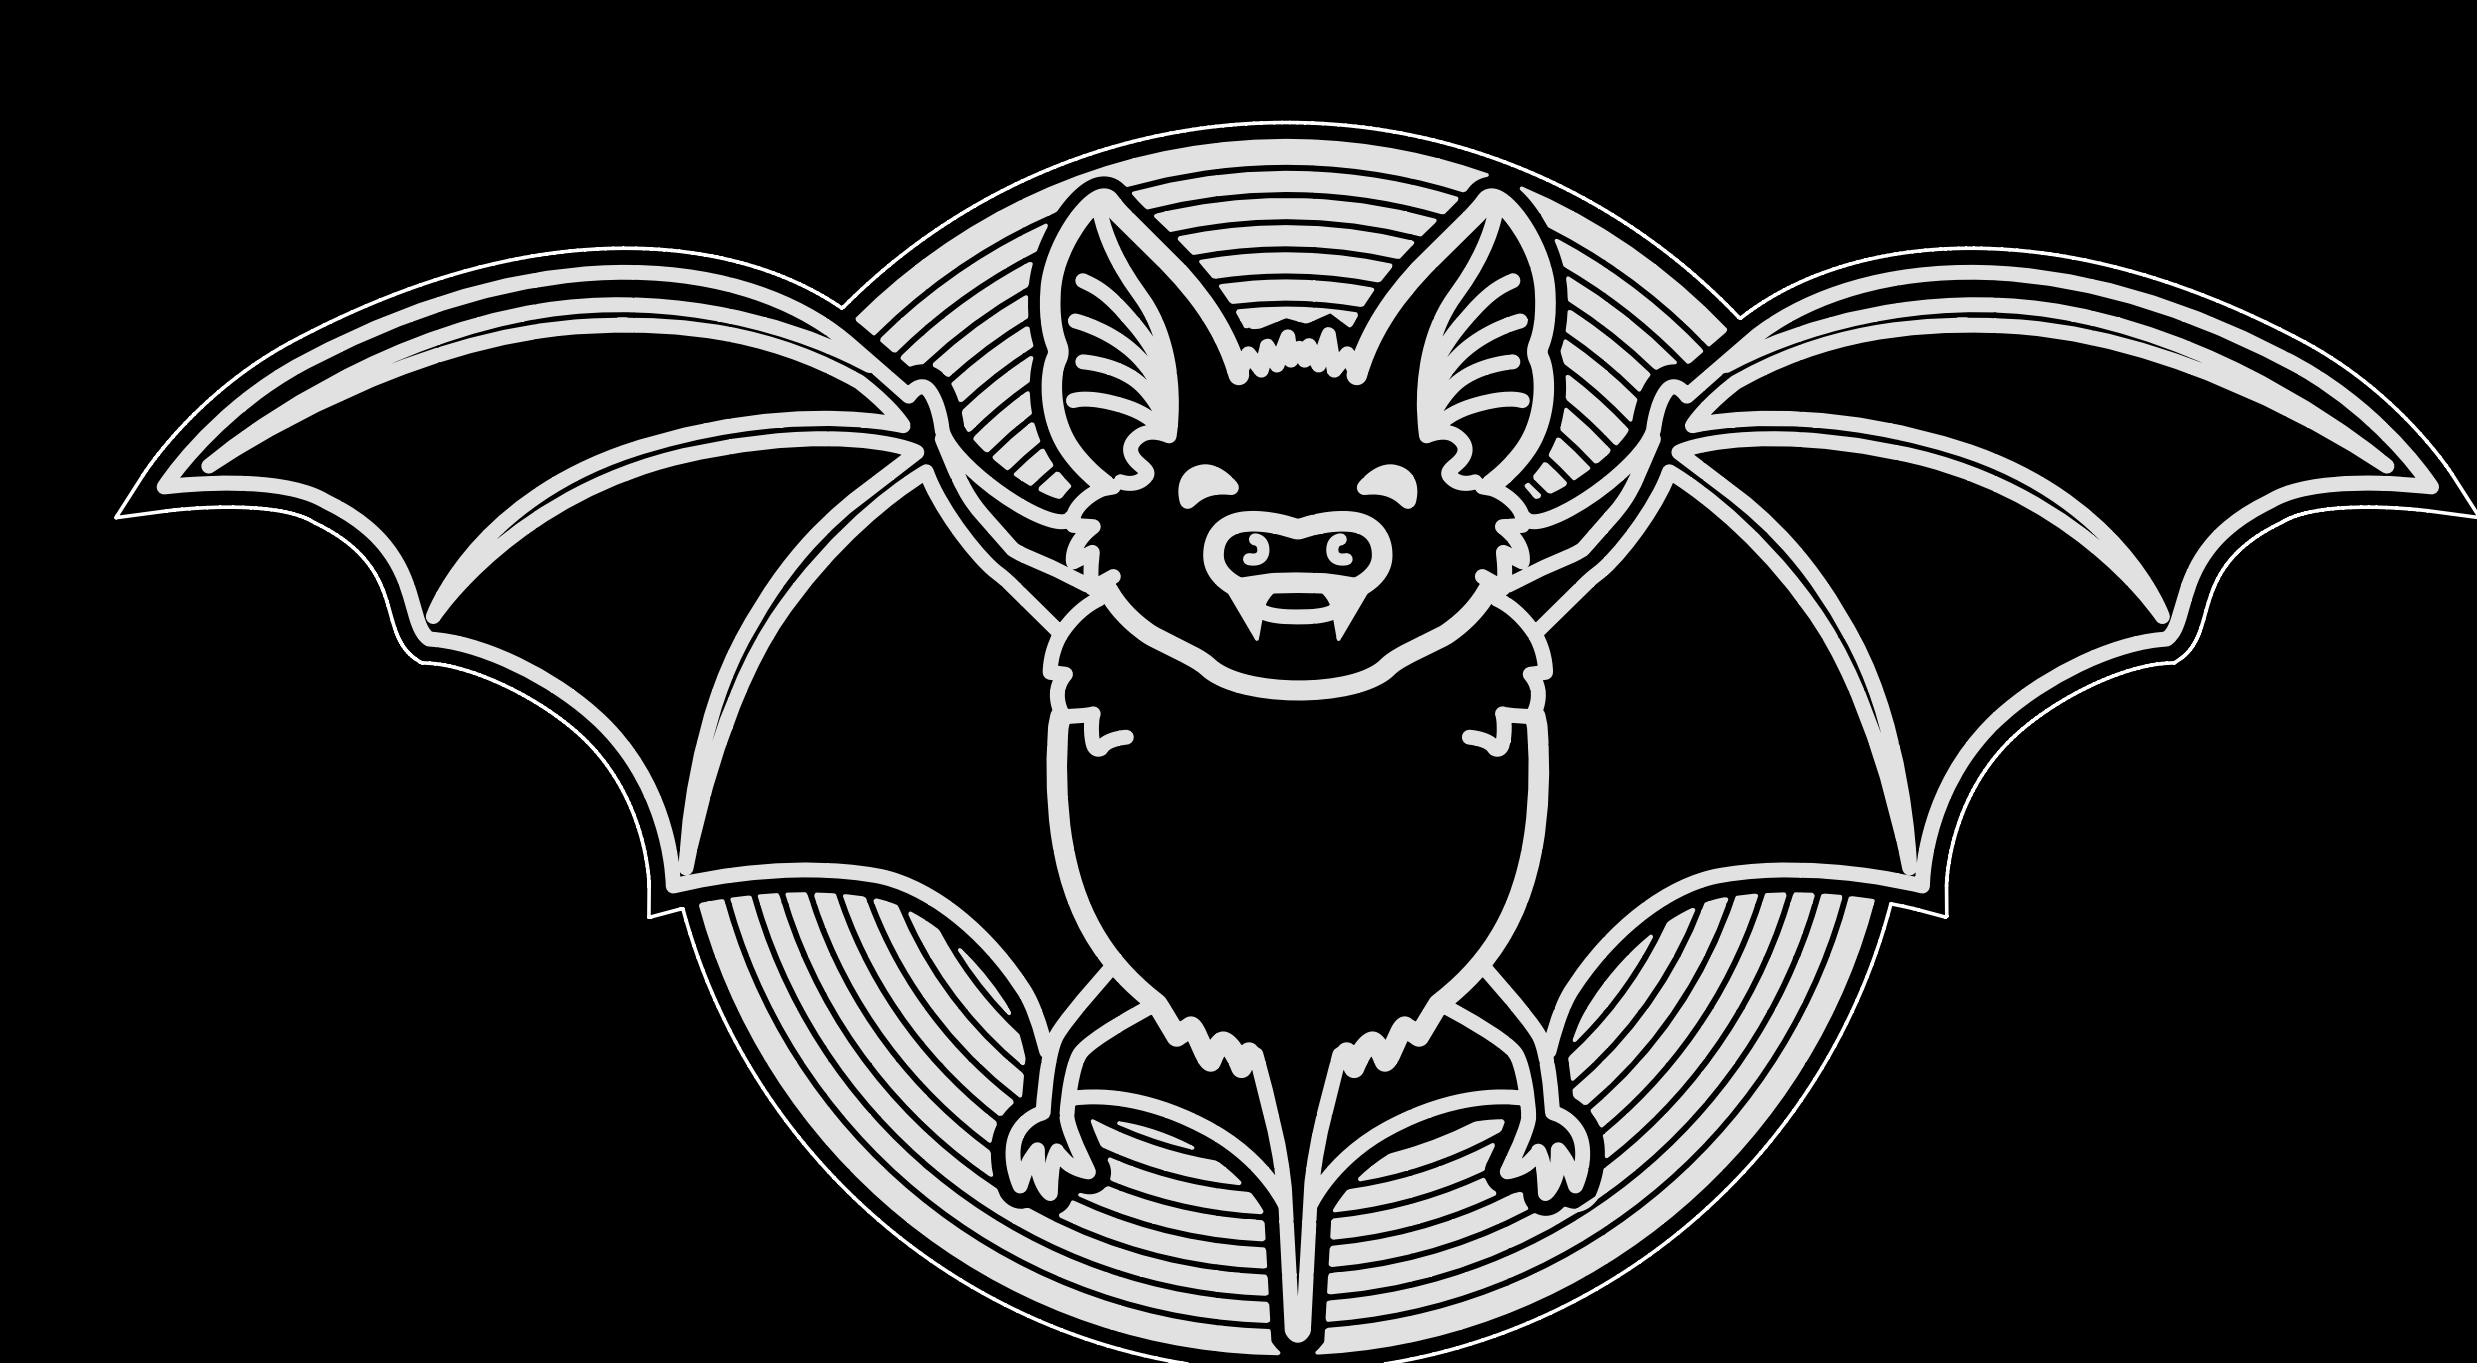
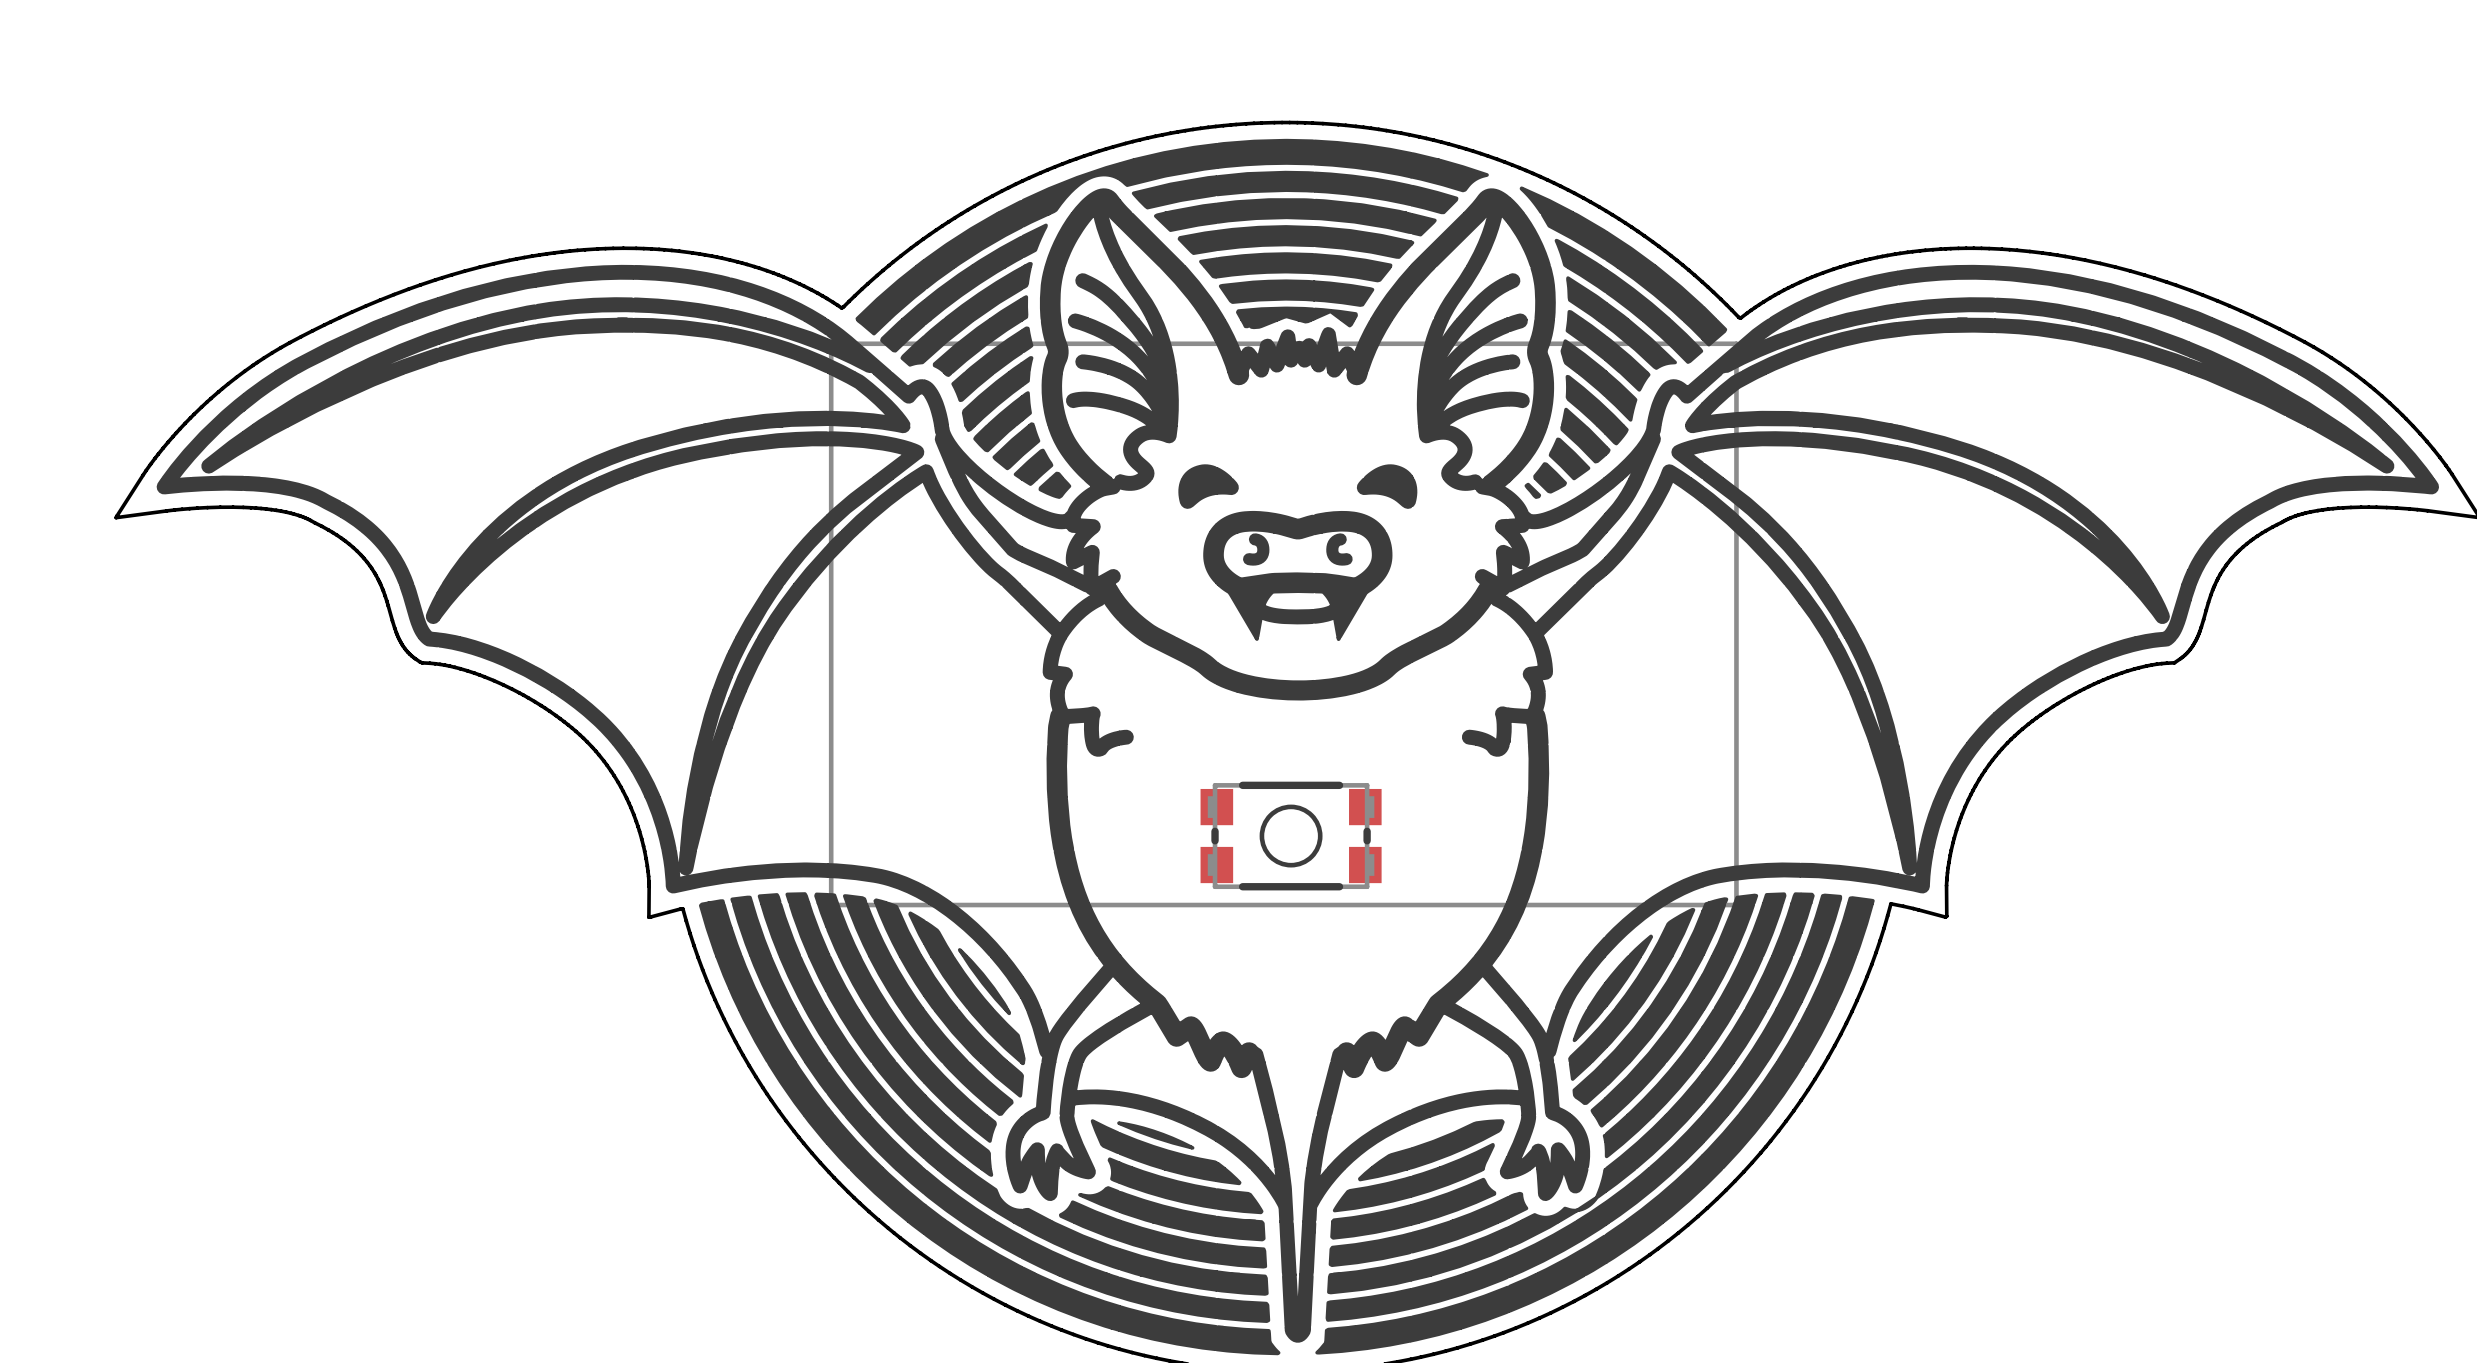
drawing: none -> [828, 341, 1739, 908]
part: none -> (1291, 836)

